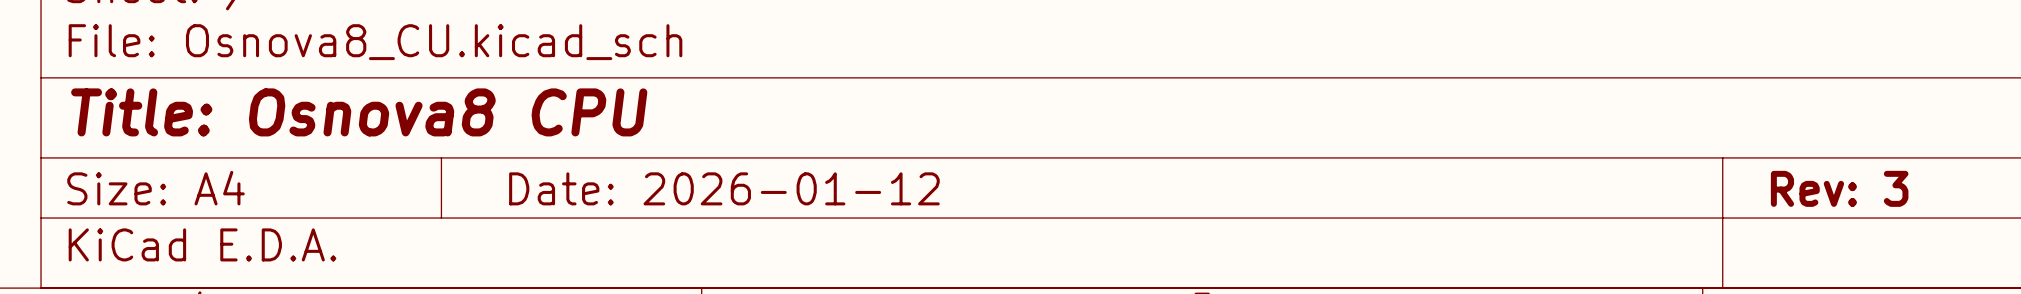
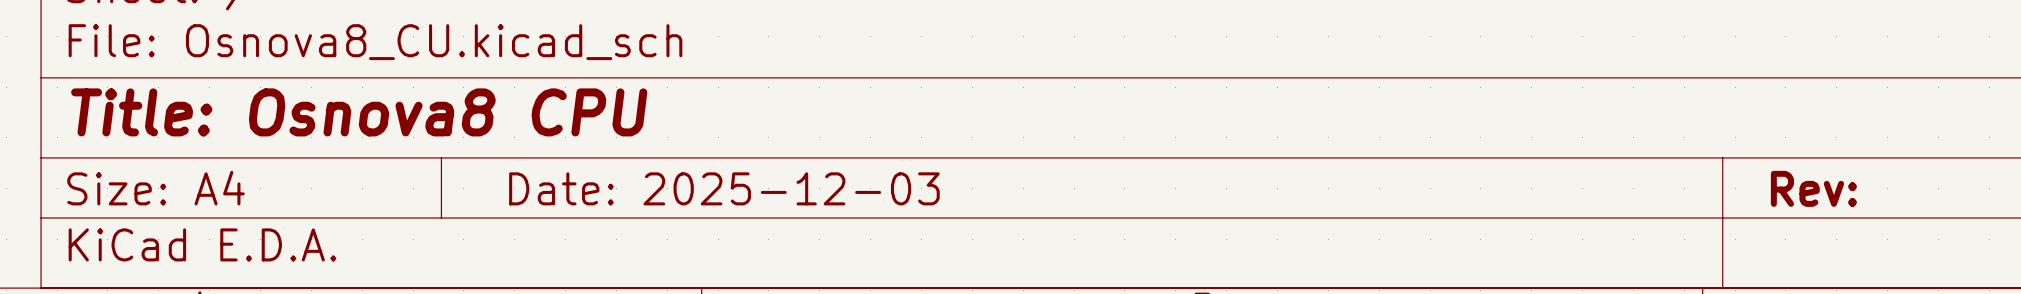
title block: Date: 2026-01-12 (724, 188) -> Date: 2025-12-03 (724, 188)
title block: Rev: 3 (1839, 188) -> Rev: (1813, 188)

